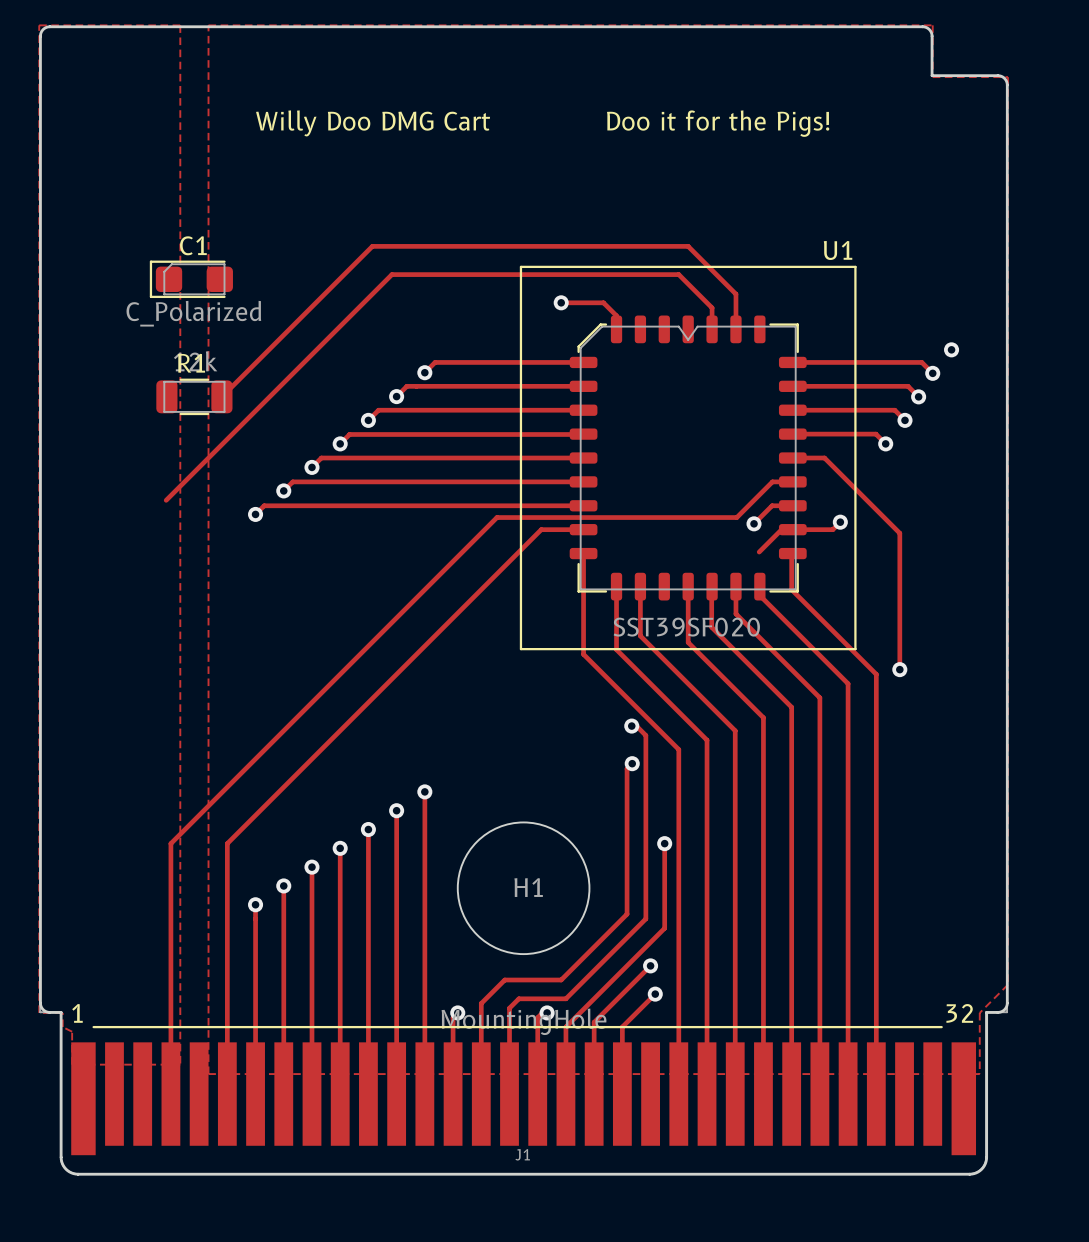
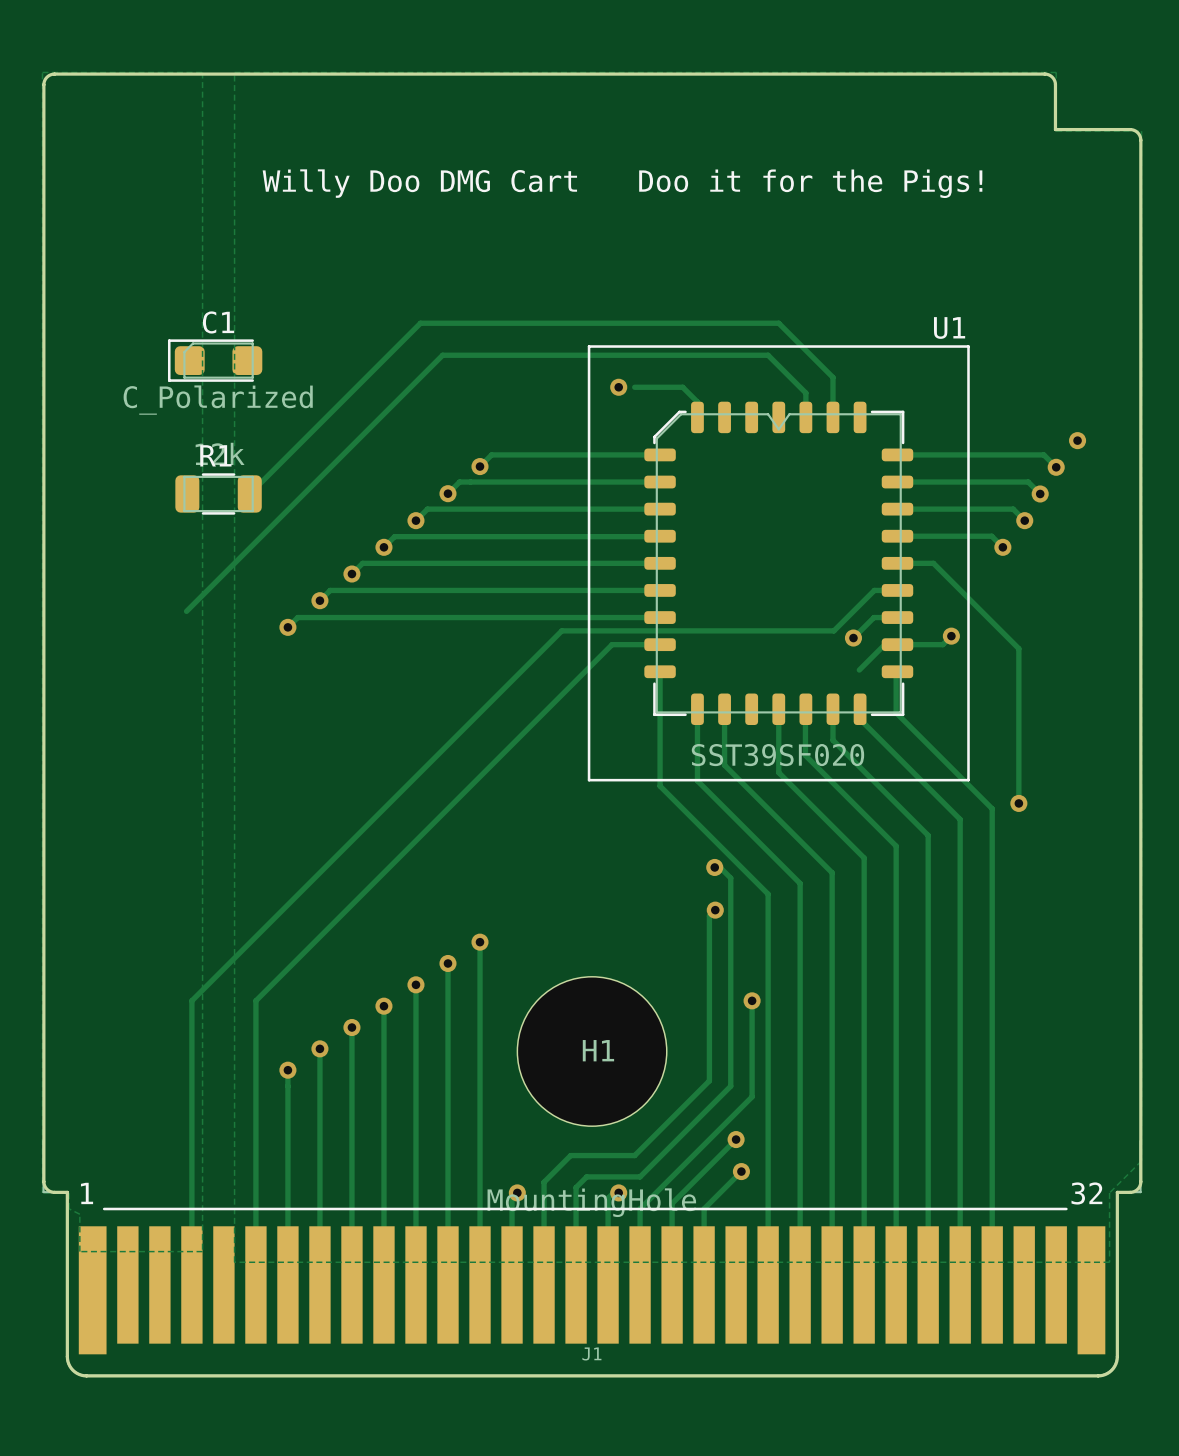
via position: (561, 302) -> (618, 387)

